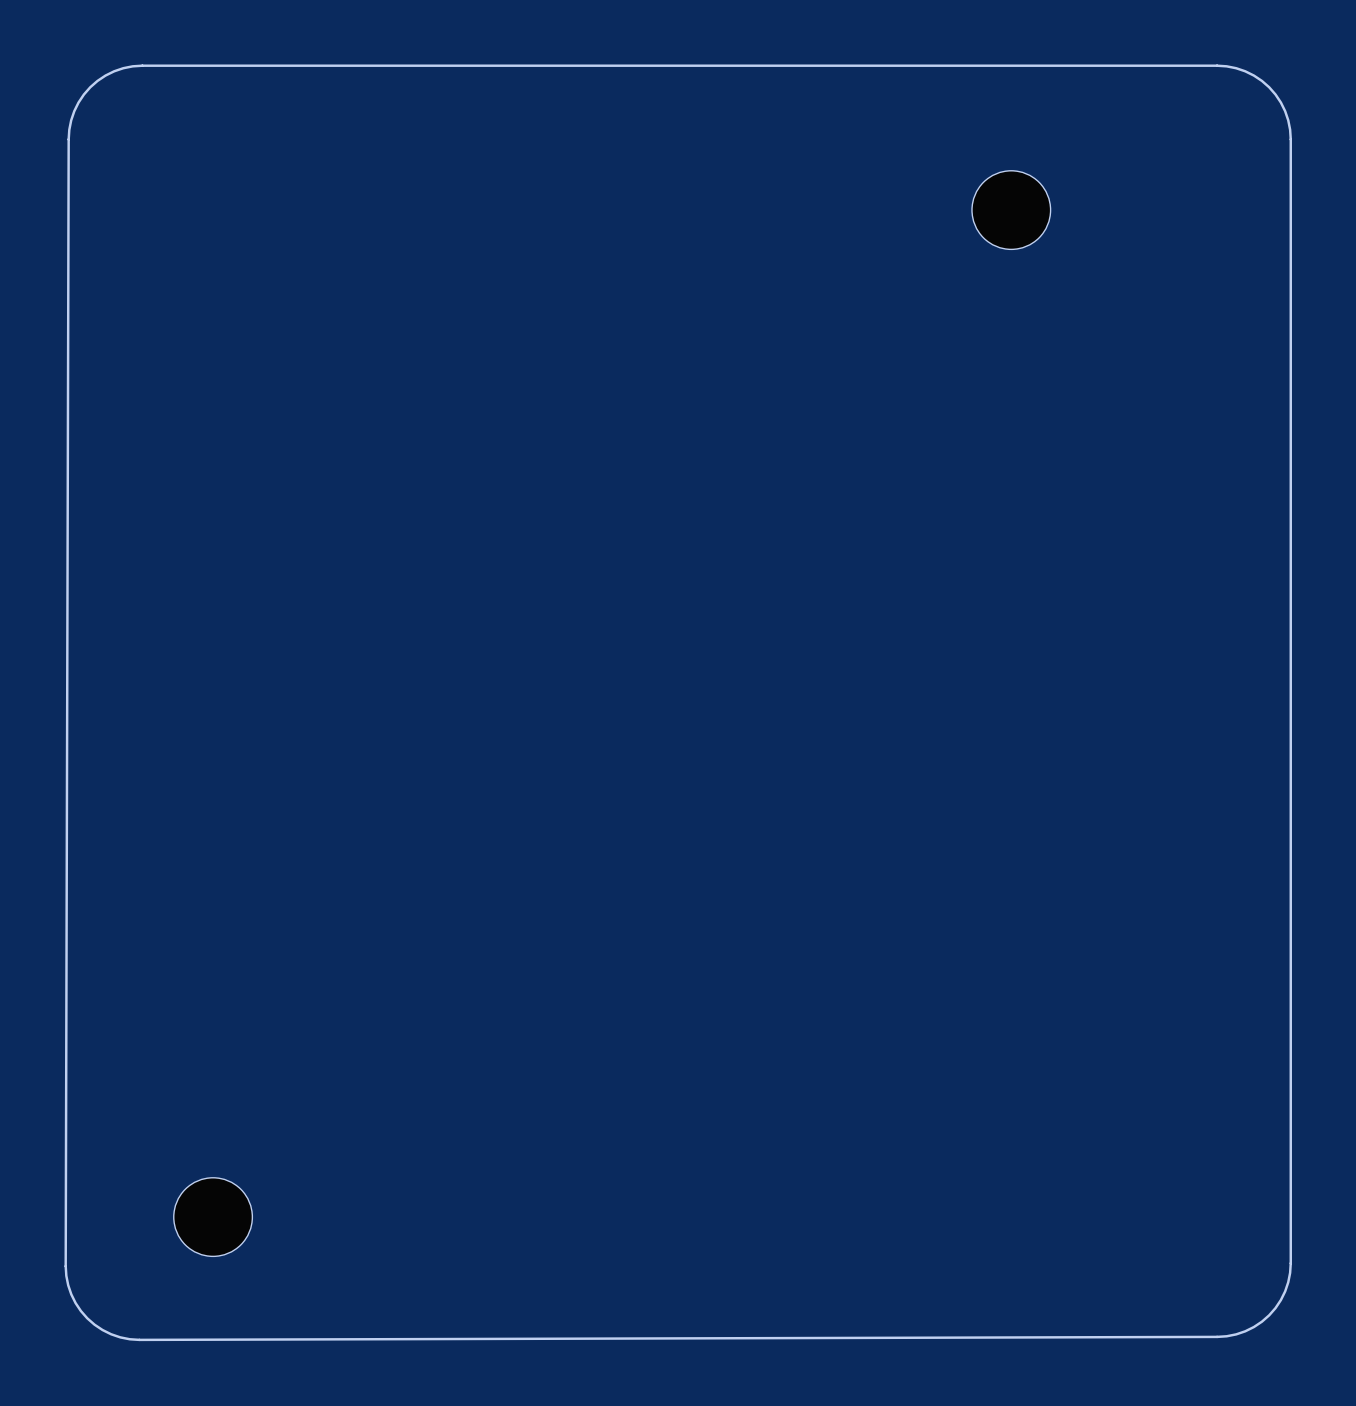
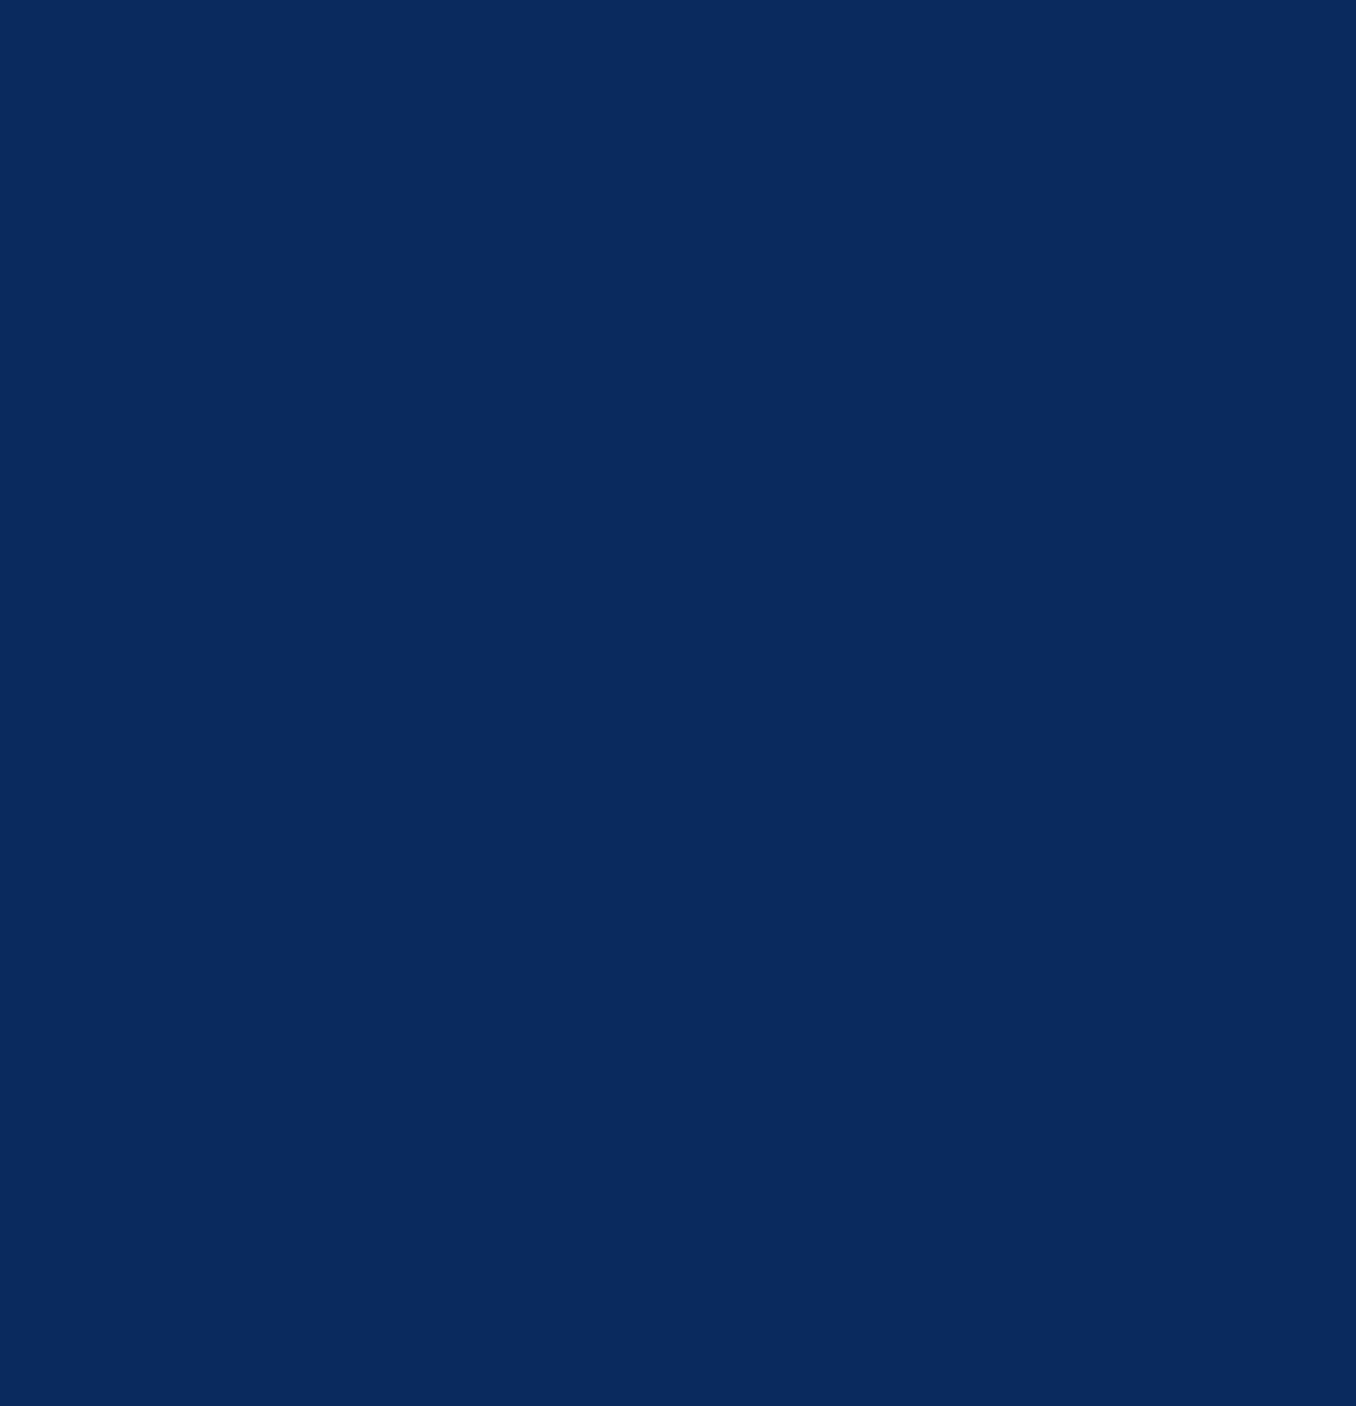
board edge: (1217, 65) (142, 65) (114, 71) (90, 87) (74, 111) (68, 139) (65, 1266) (71, 1294) (87, 1318) (111, 1334) (139, 1339) (1217, 1336) (1245, 1331) (1269, 1315) (1285, 1291) (1290, 1263) (1290, 139) (1285, 111) (1269, 87) (1245, 71) (1217, 65) -> none
part: (1011, 210) -> none
part: (213, 1217) -> none

